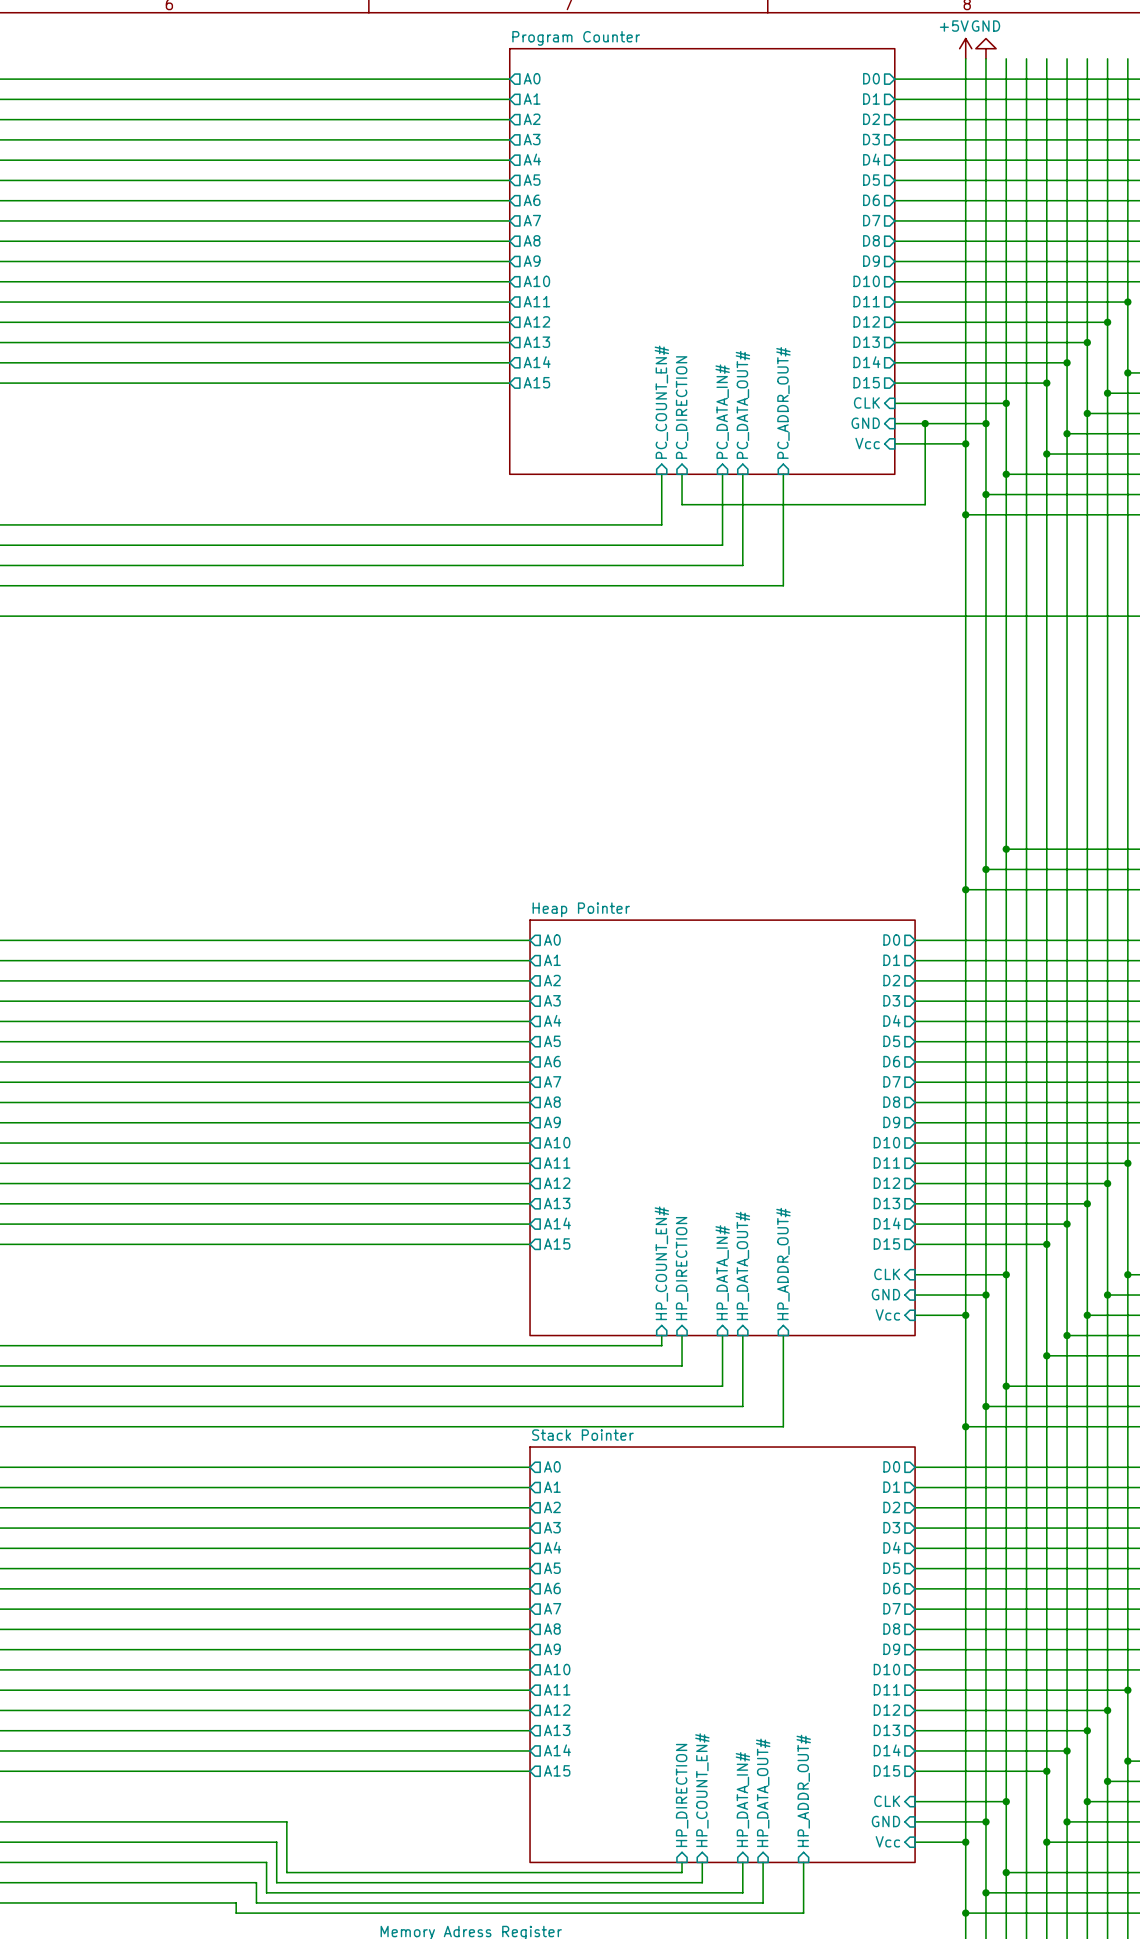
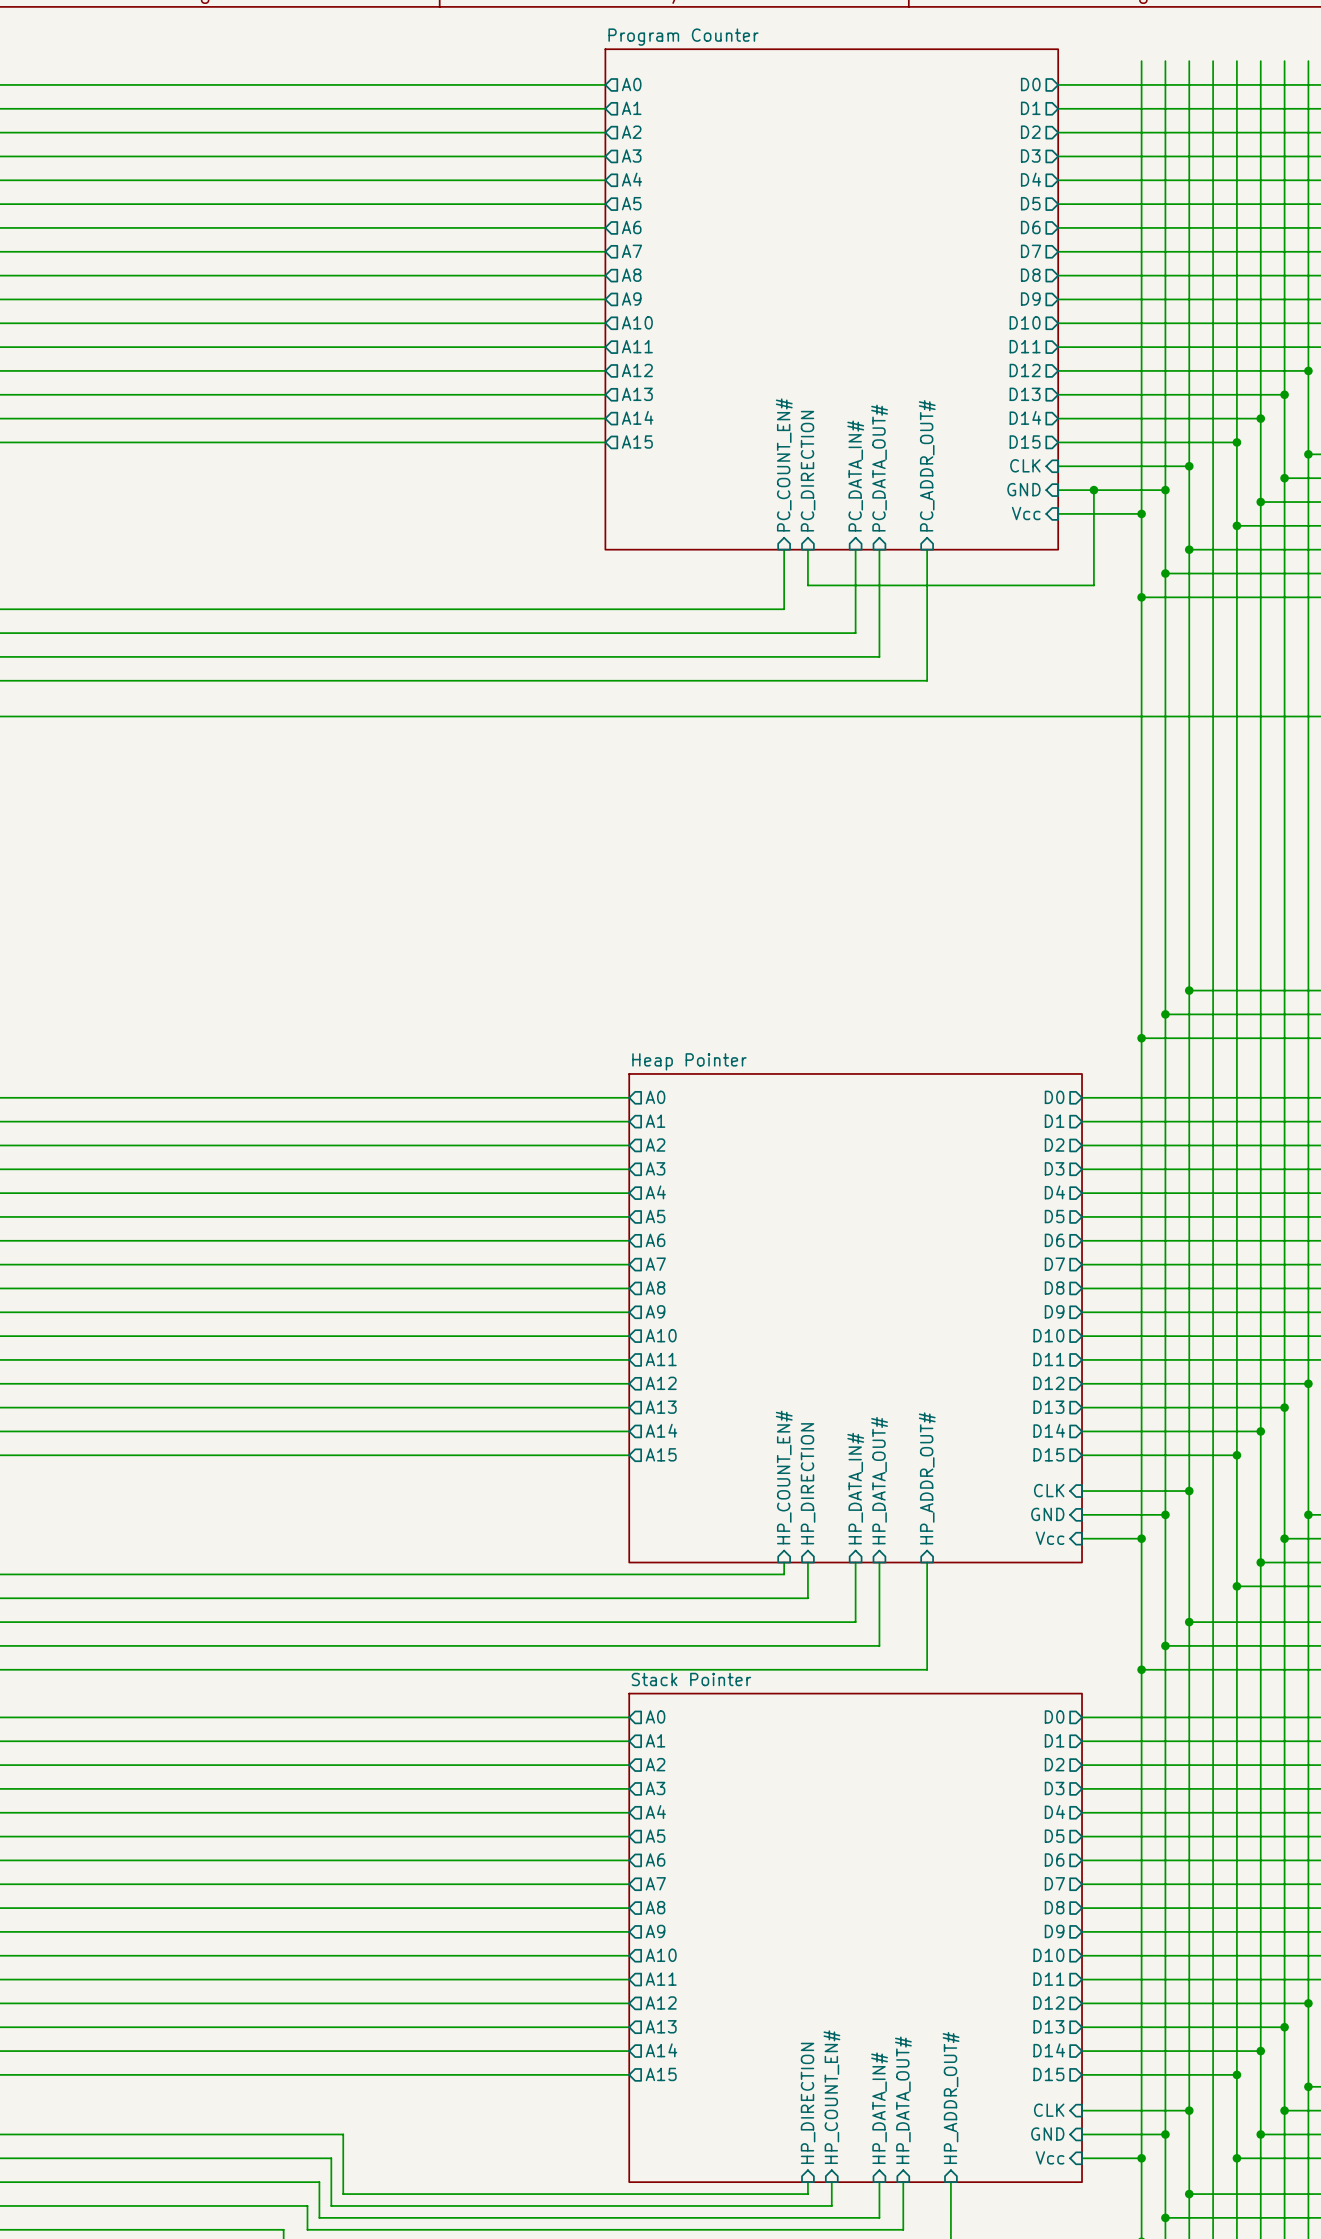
power symbol: +5V (965, 48) -> none
power symbol: GND (985, 48) -> none

